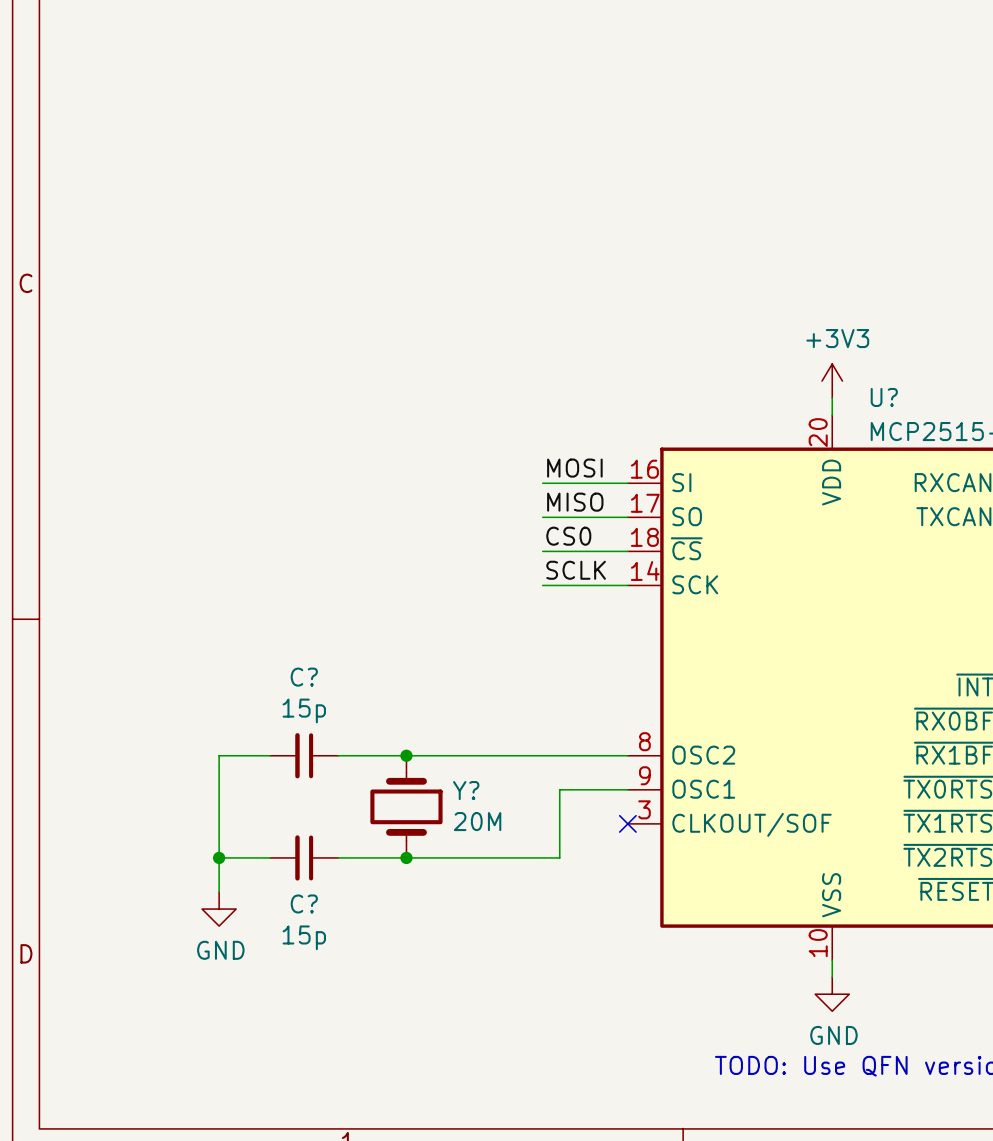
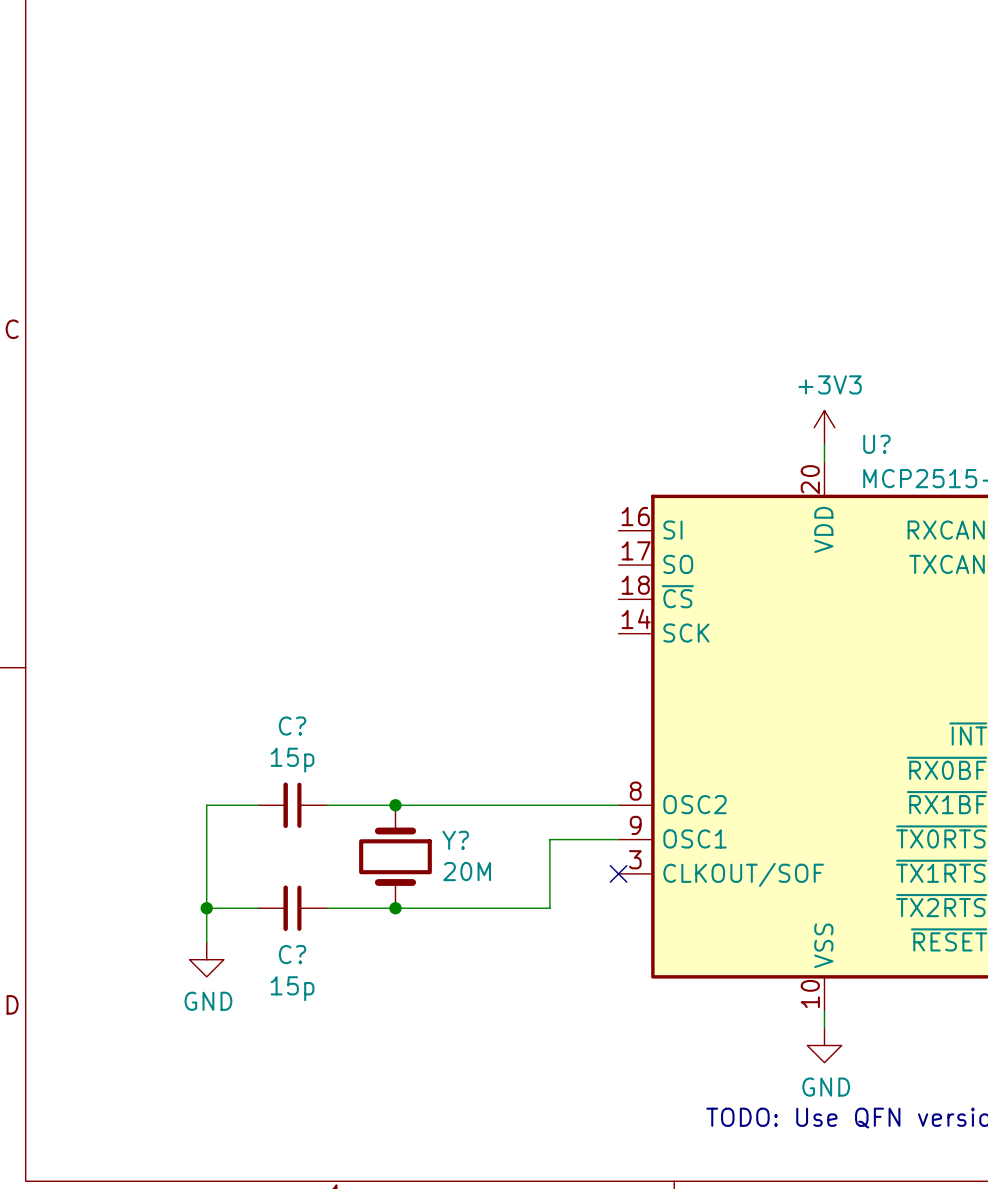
label: MOSI (574, 468) -> none
wire: (542, 483) (627, 483) -> none
label: MISO (575, 502) -> none
wire: (542, 517) (627, 517) -> none
label: CS0 (568, 536) -> none
wire: (542, 551) (627, 551) -> none
label: SCLK (576, 570) -> none
wire: (542, 585) (627, 585) -> none

